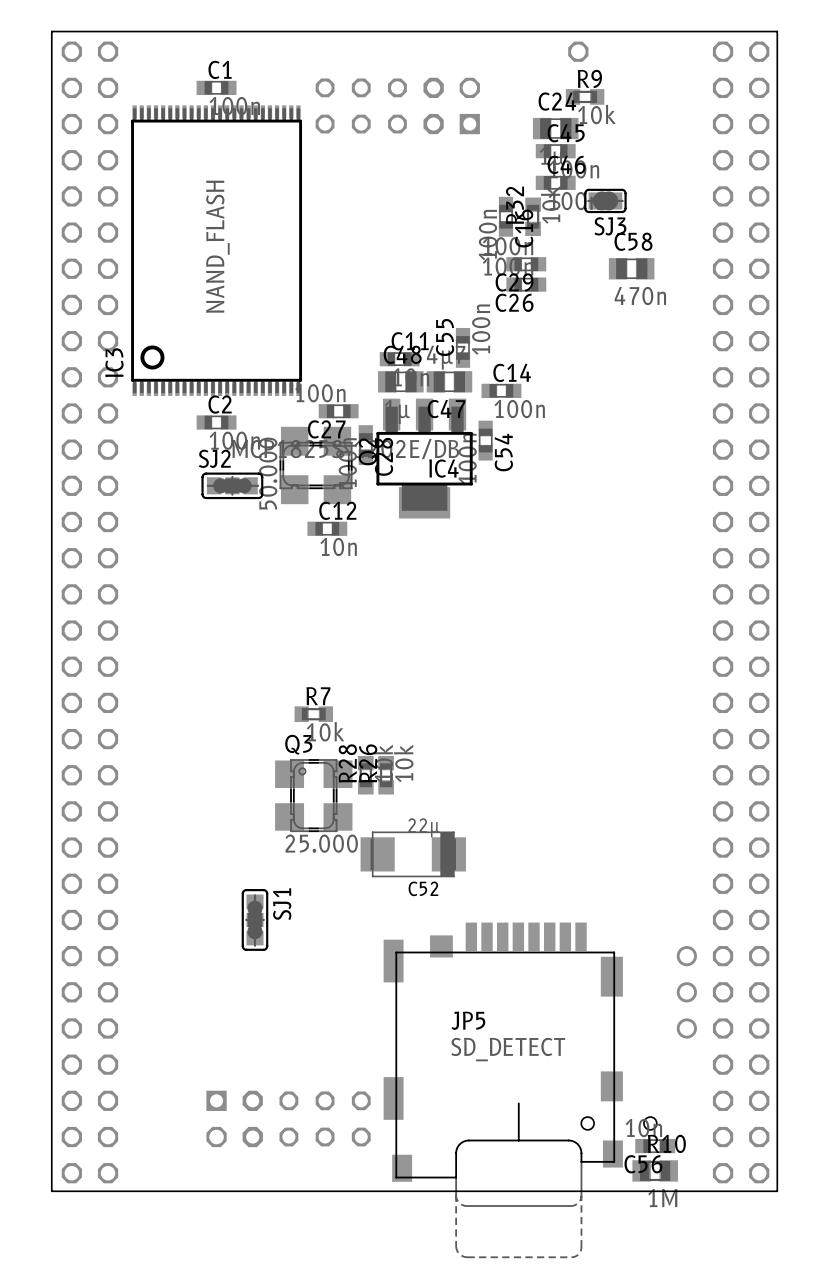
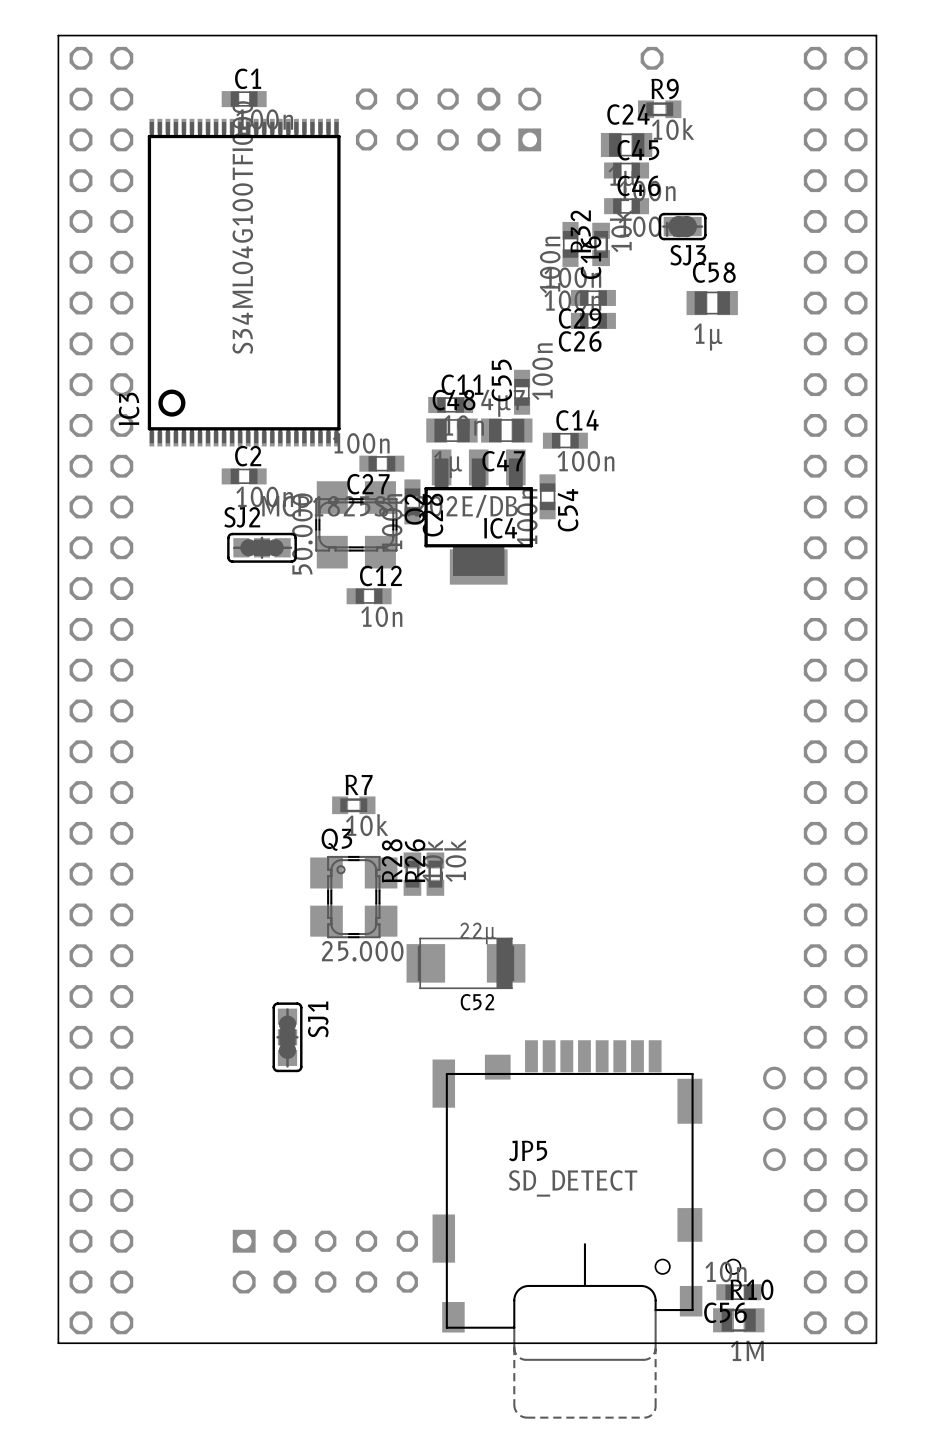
IC3 value: NAND_FLASH (217, 246) -> S34ML04G100TFI000 (242, 227)
C58 value: 470n (640, 296) -> 1µ (708, 337)

